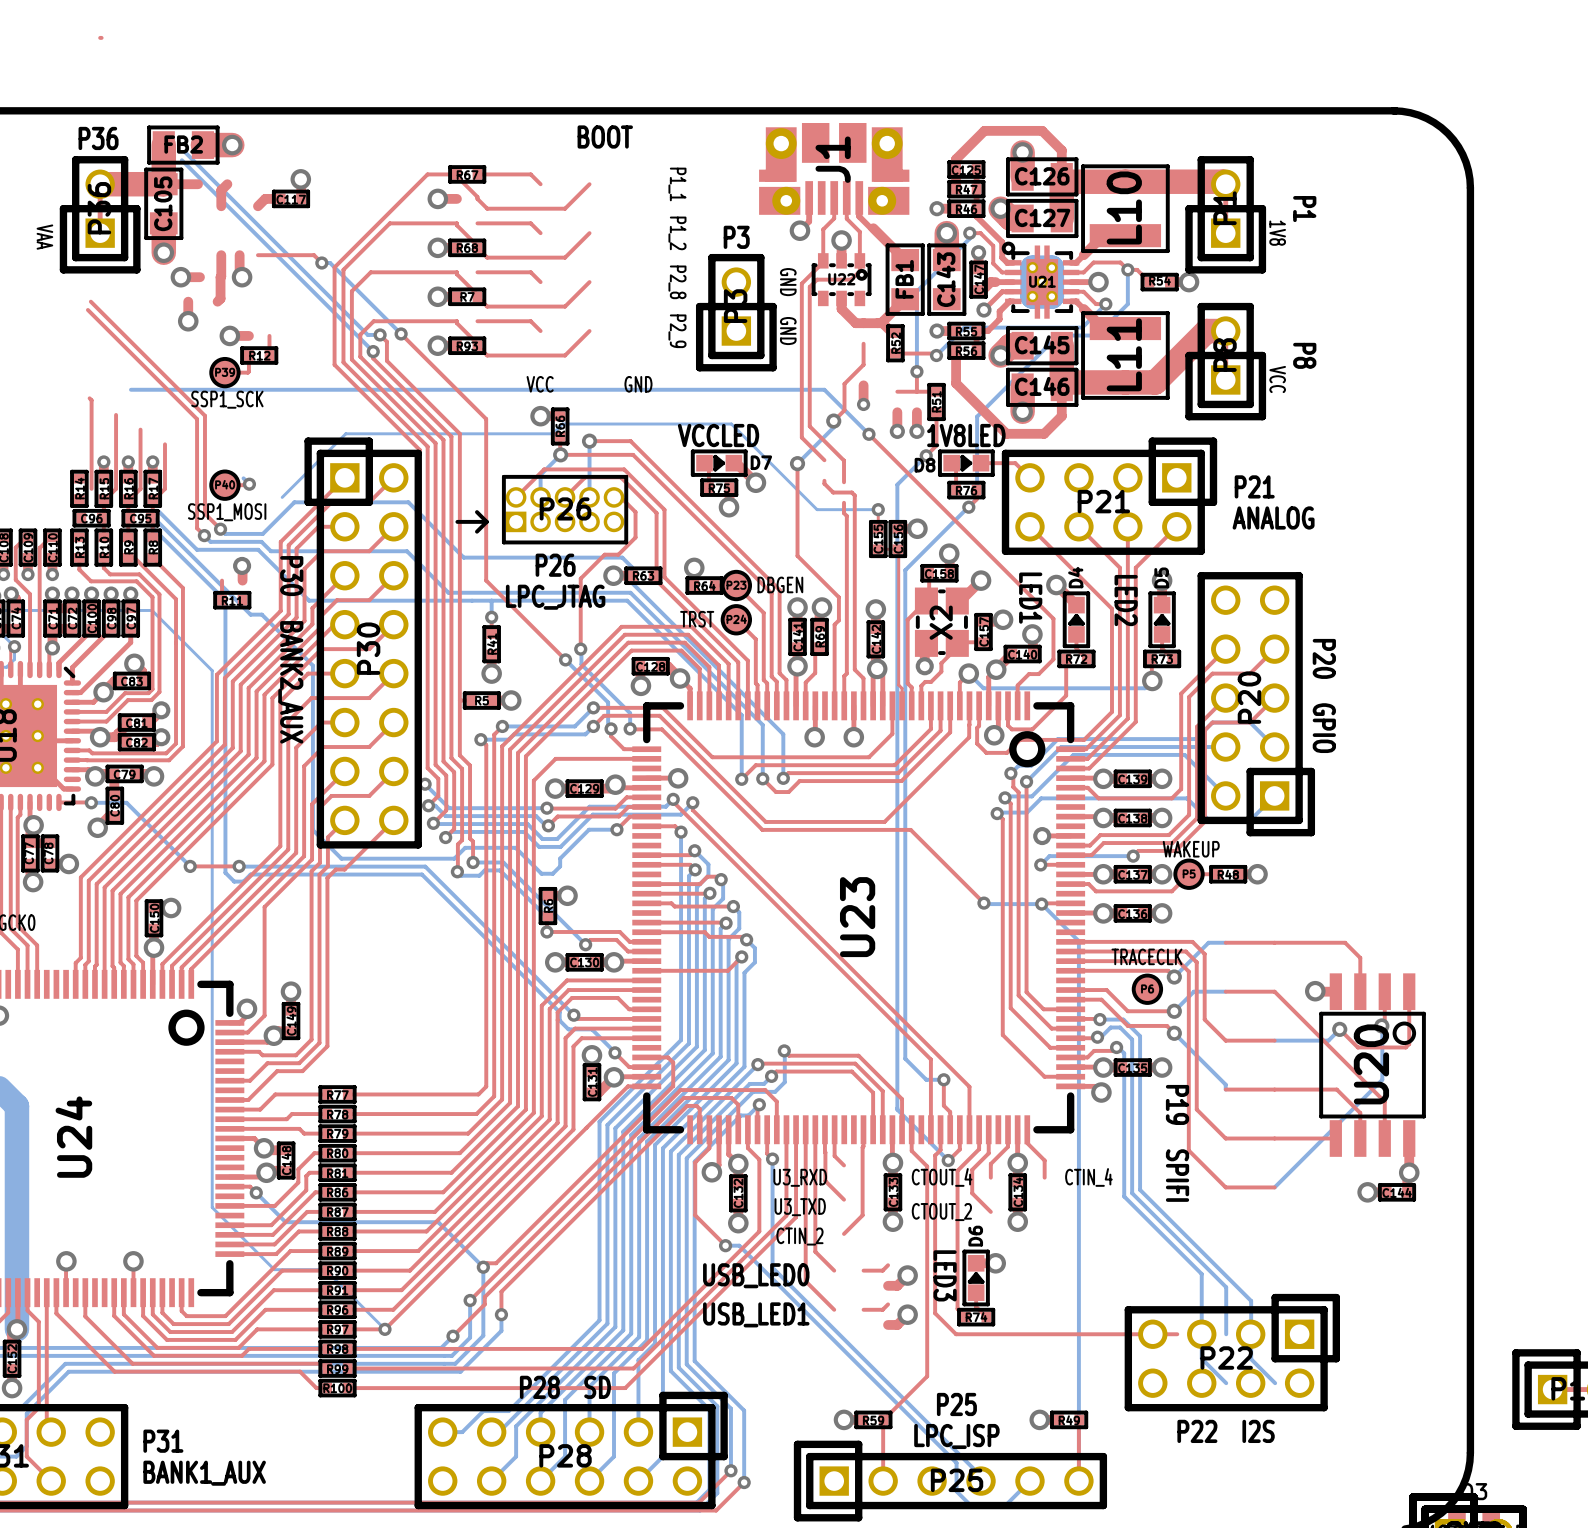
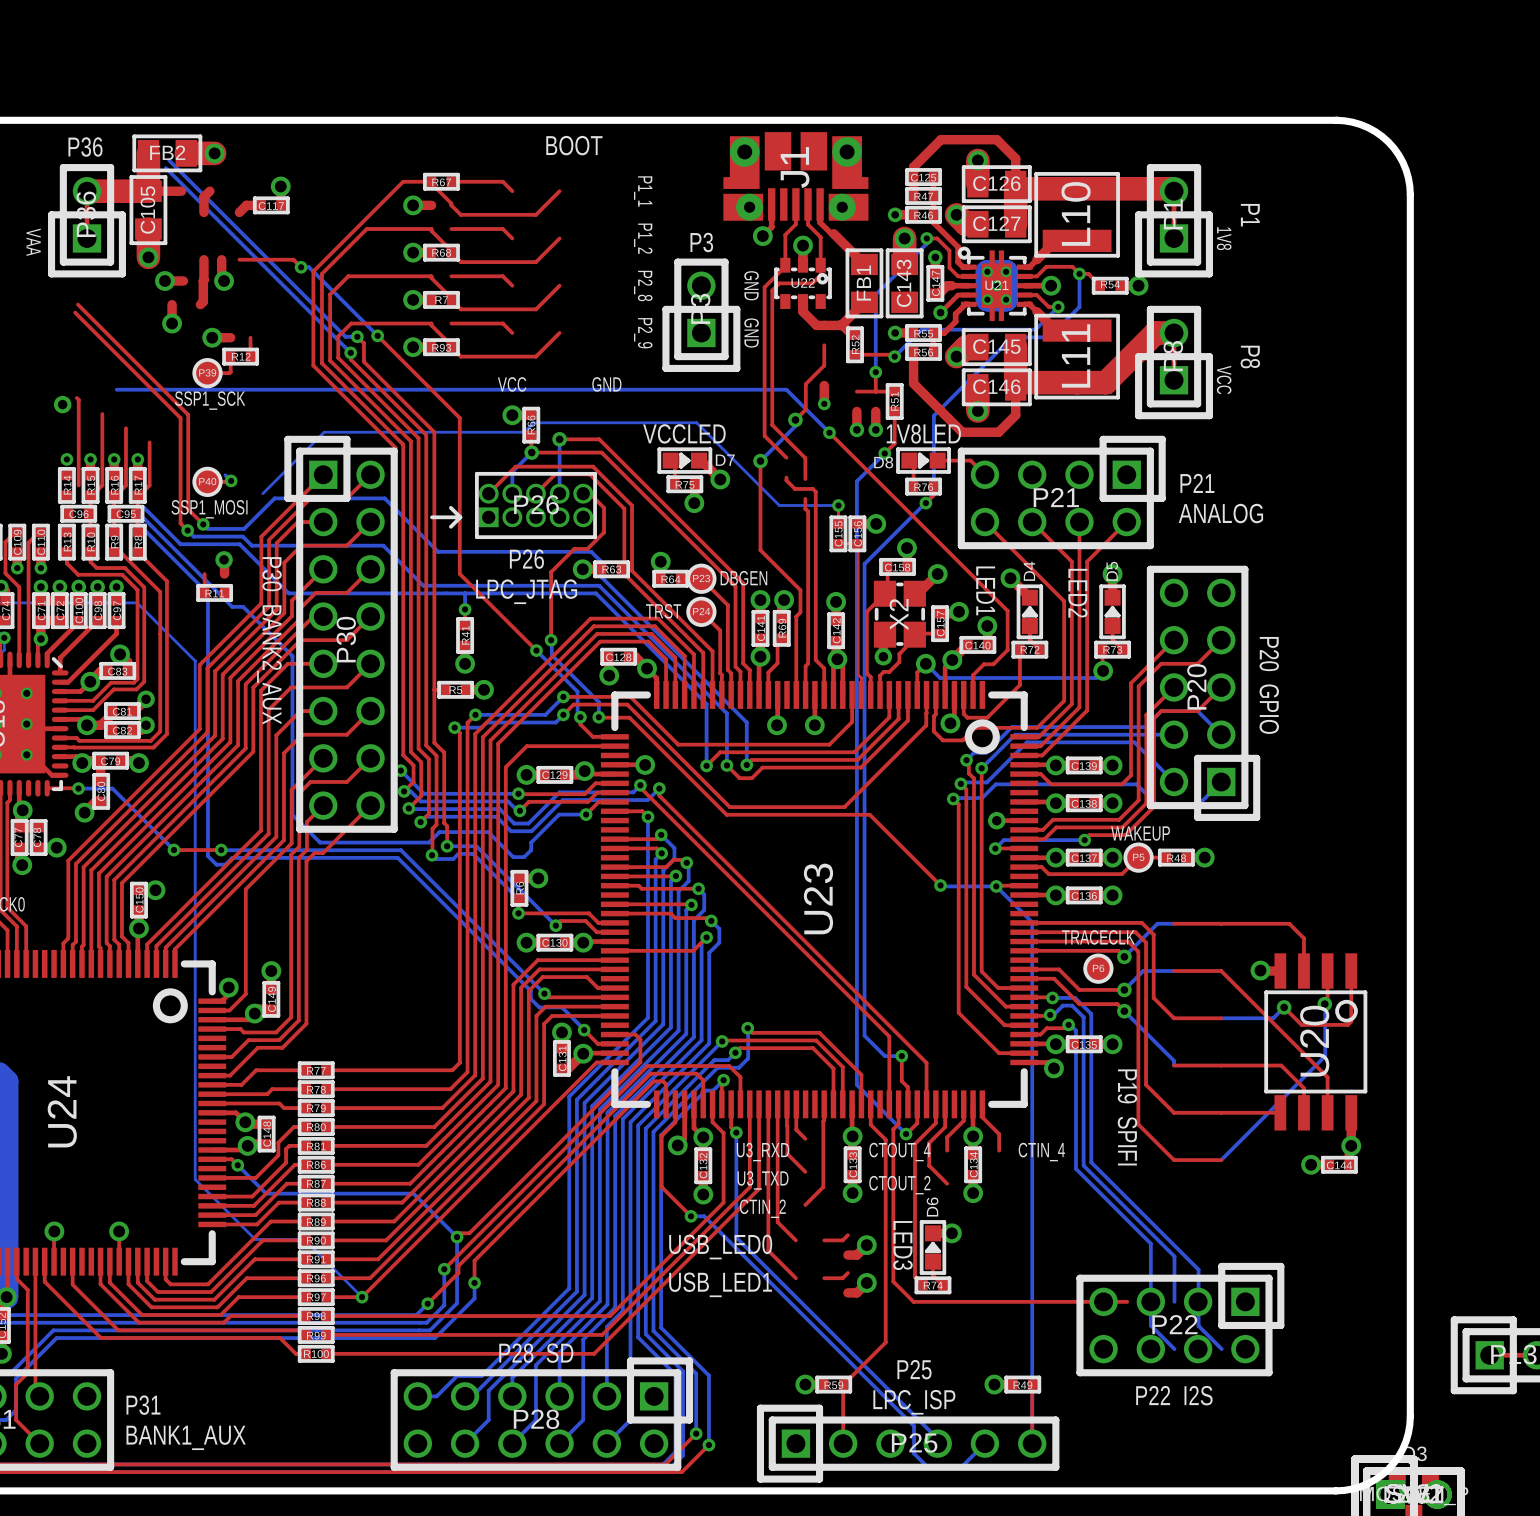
top track: (100, 37) (101, 37) -> none
via: none -> (62, 404)
via: none -> (66, 459)

